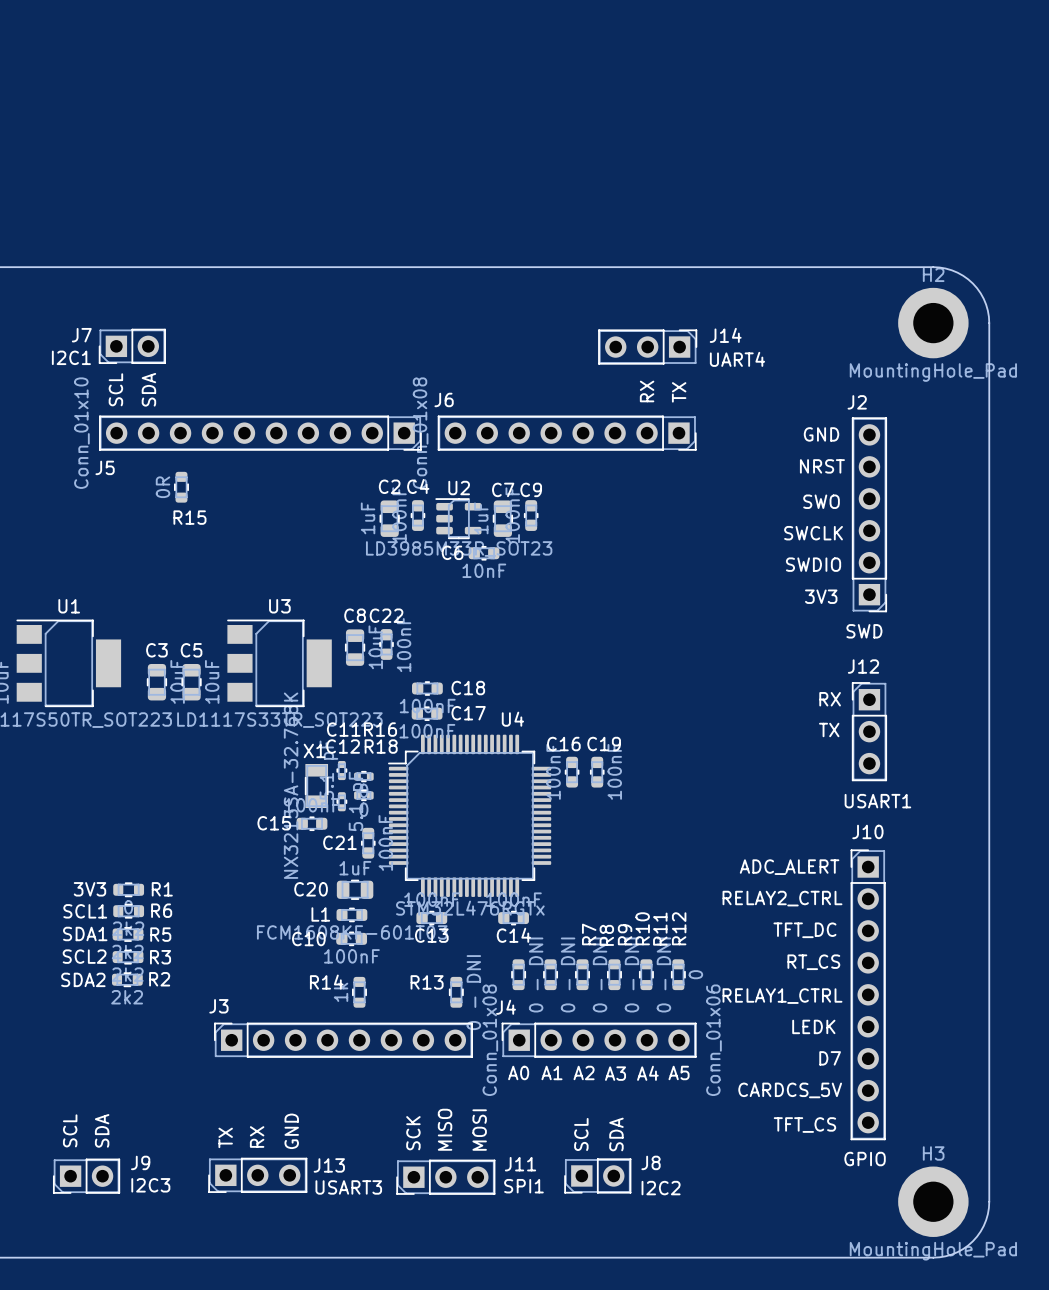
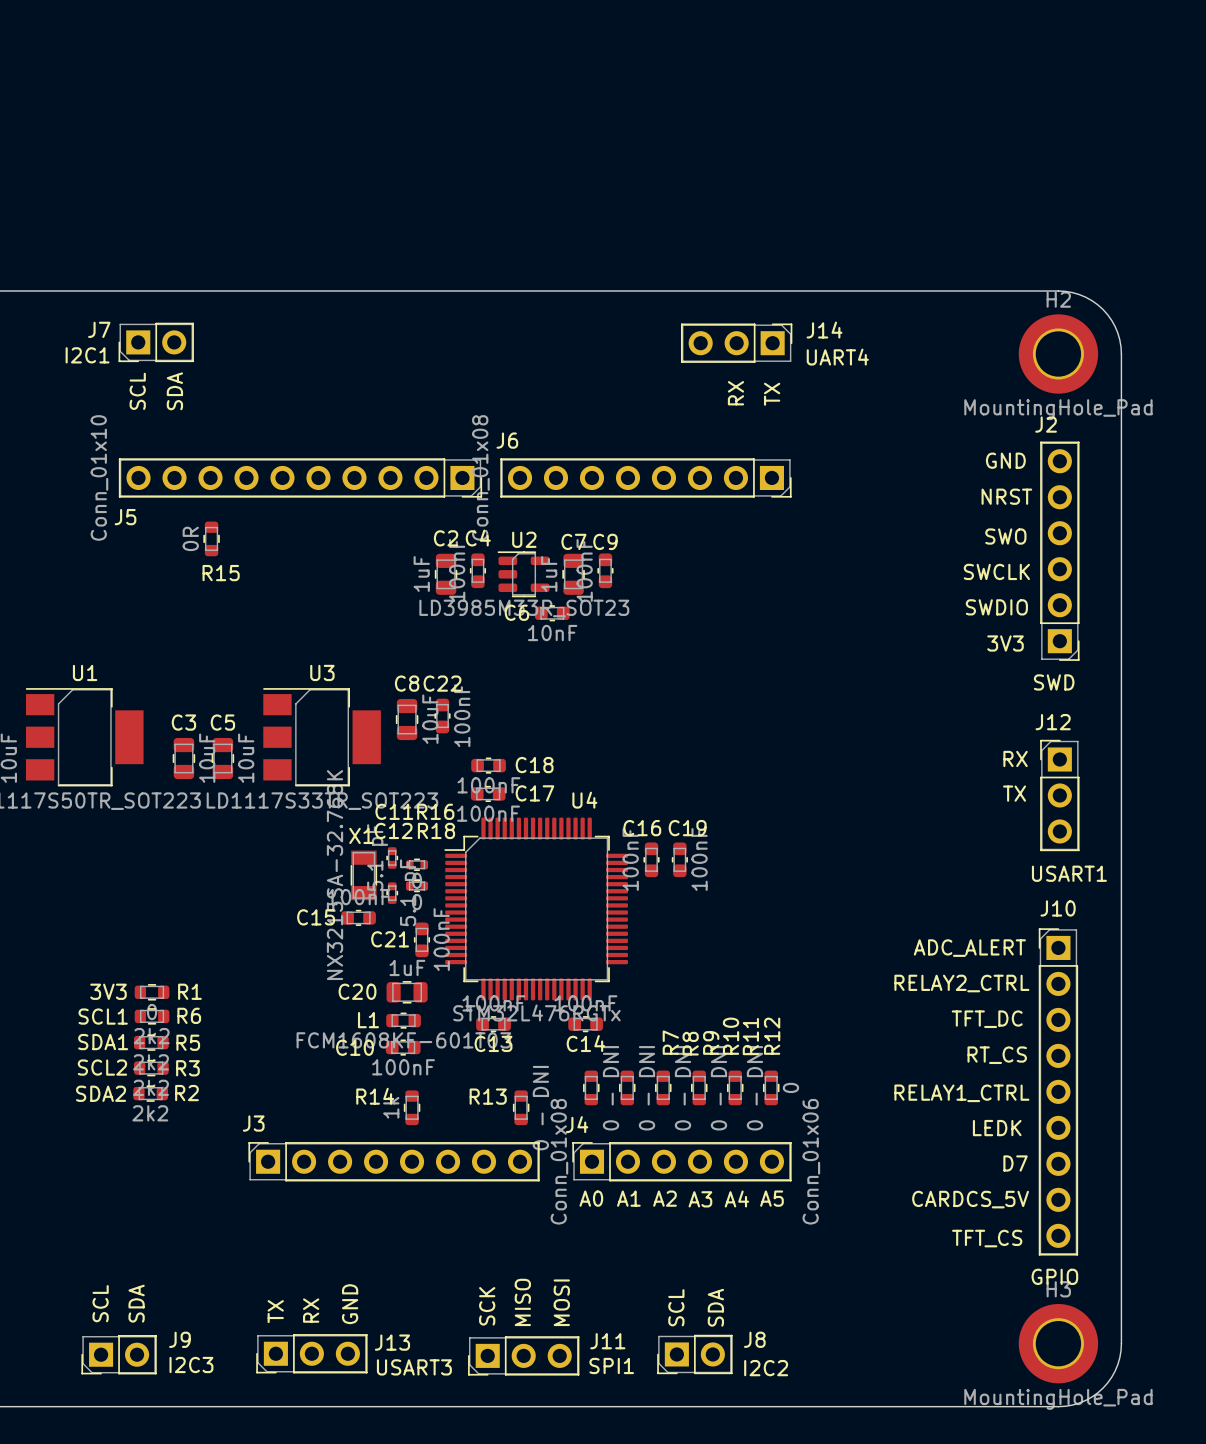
J7 position: (132, 346) -> (156, 342)
J14 position: (647, 347) -> (736, 343)
J2 position: (869, 514) -> (1059, 551)
J12 position: (869, 731) -> (1059, 795)
J10 position: (868, 994) -> (1058, 1091)
J13 position: (257, 1175) -> (311, 1353)
J8 position: (597, 1175) -> (694, 1354)
J9 position: (86, 1176) -> (119, 1354)
J11 position: (445, 1177) -> (523, 1355)

